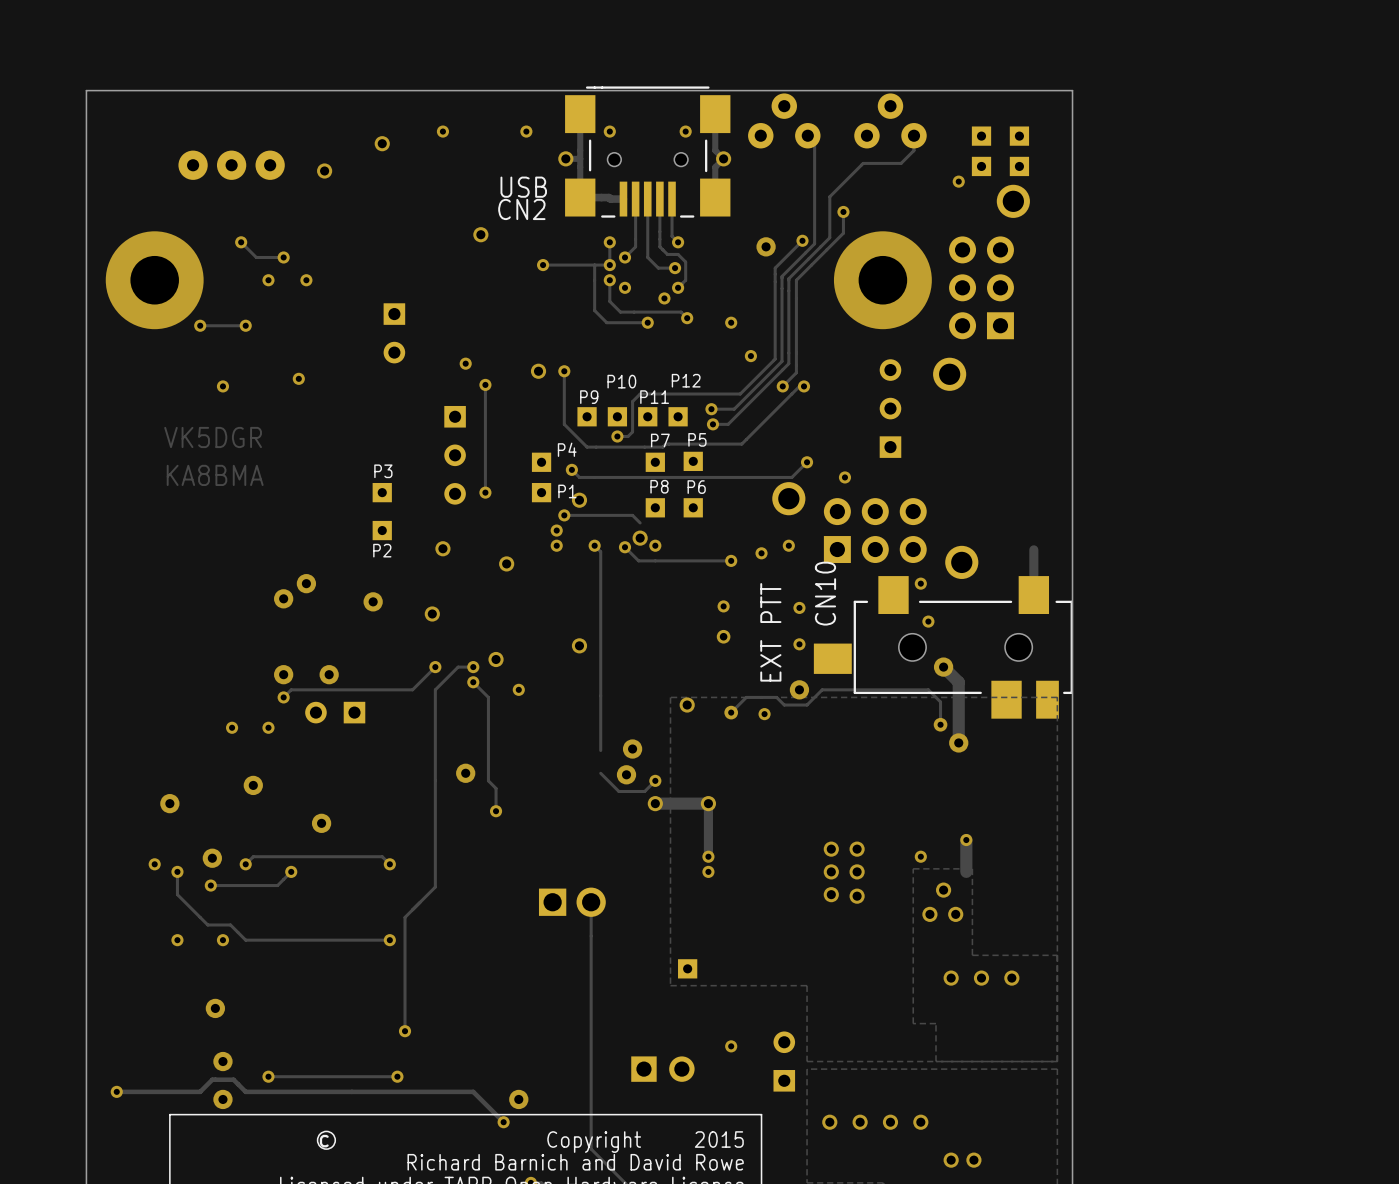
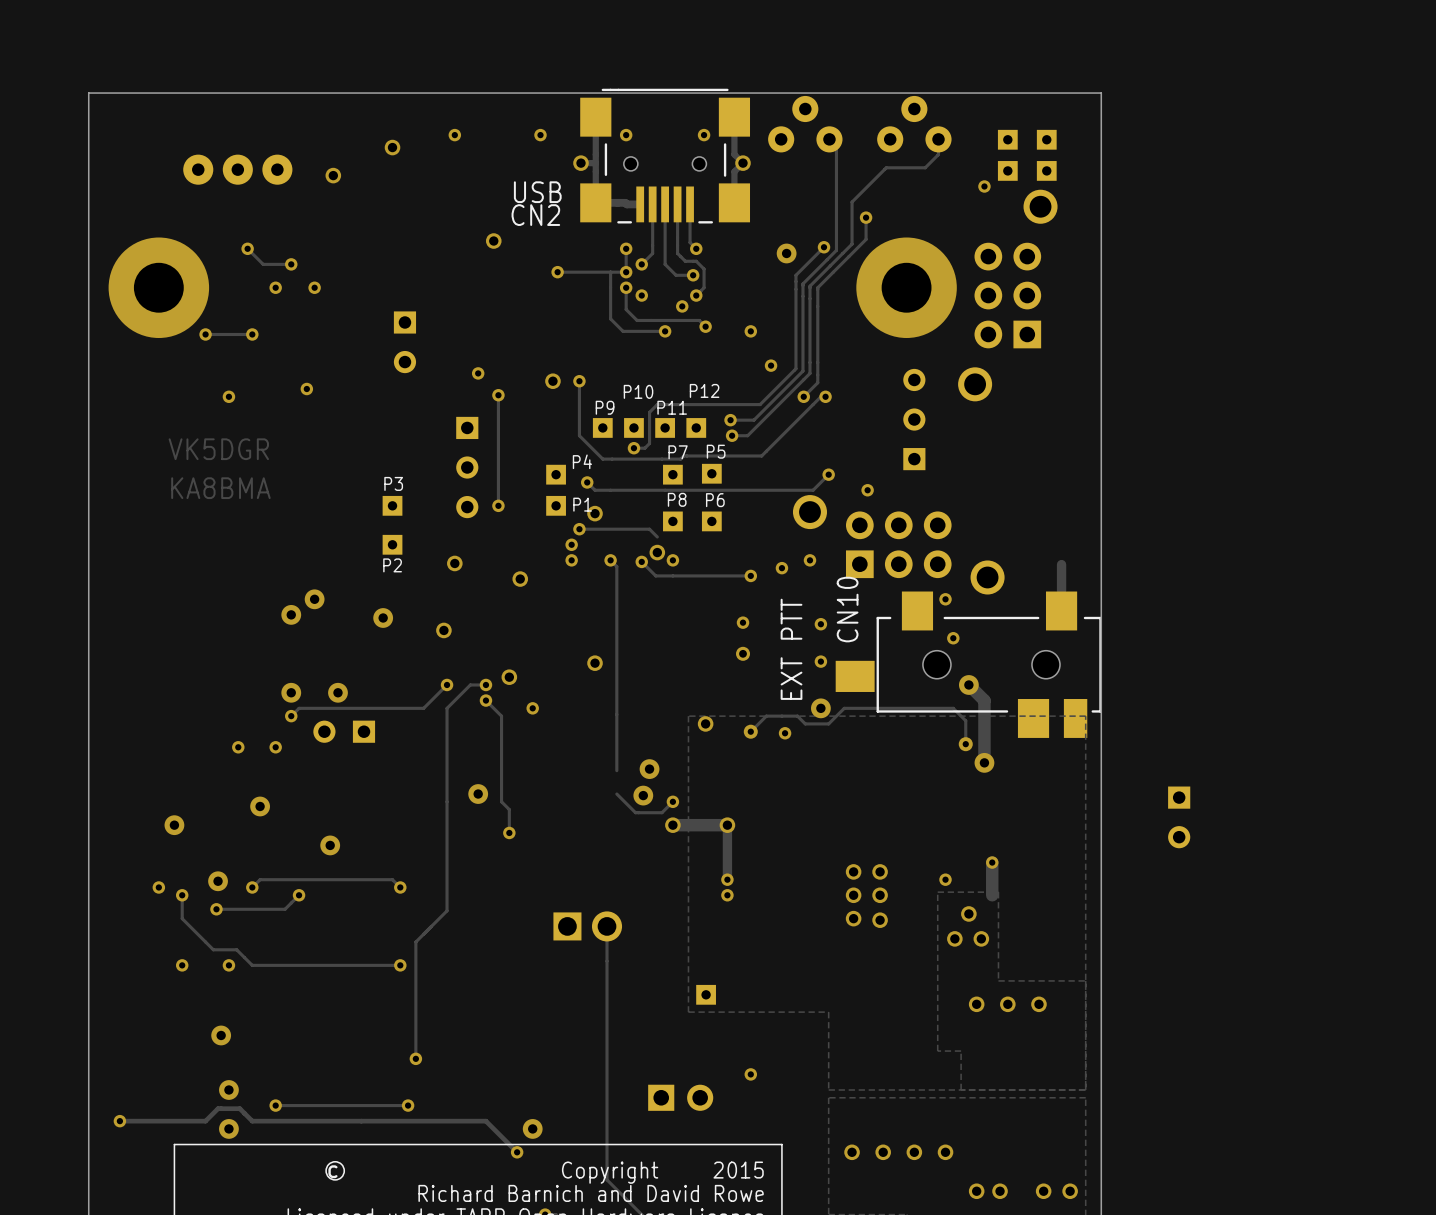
part: none -> (1179, 817)
part: (784, 1061) -> none
via: none -> (1043, 1191)
via: none -> (1070, 1191)

